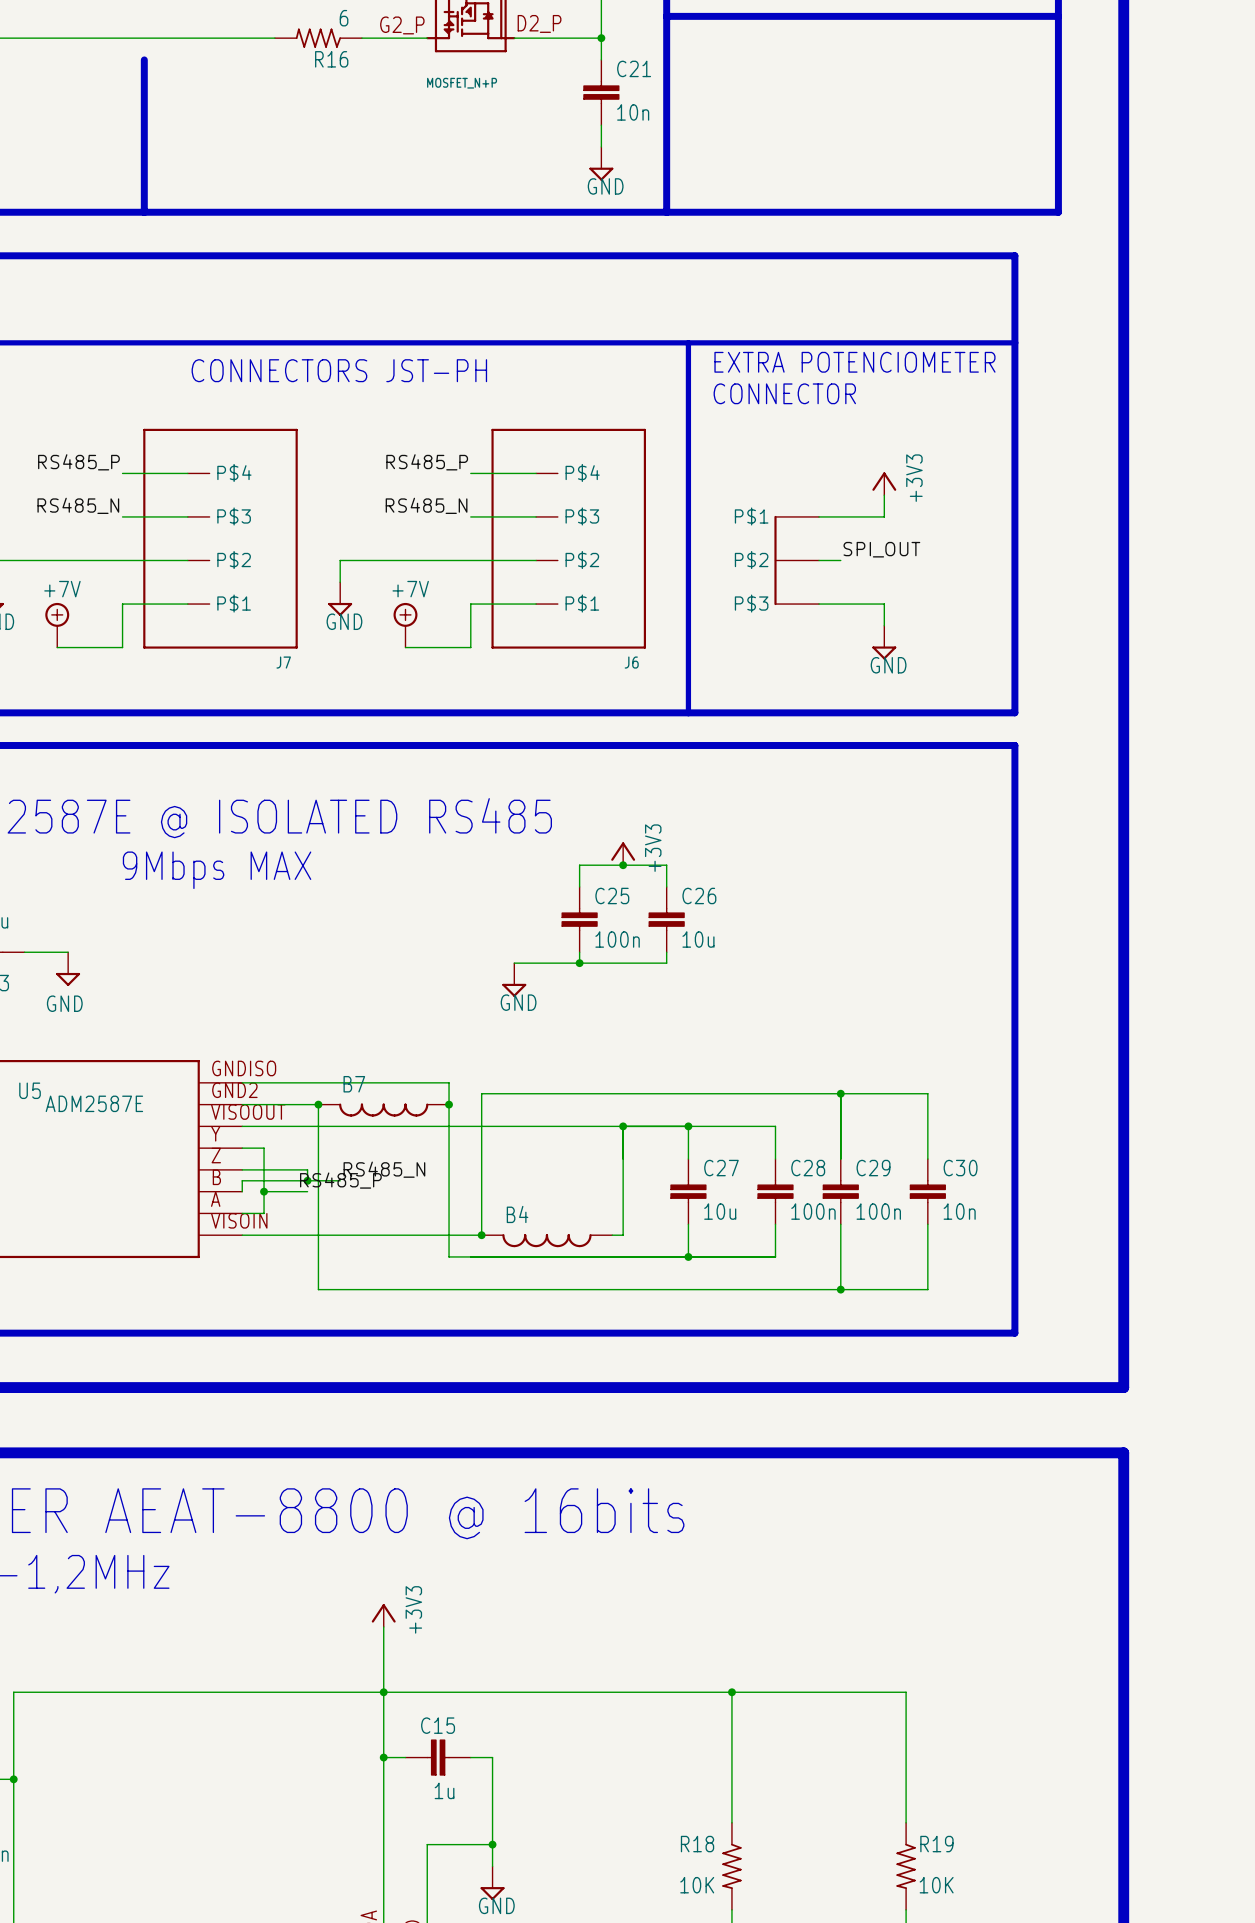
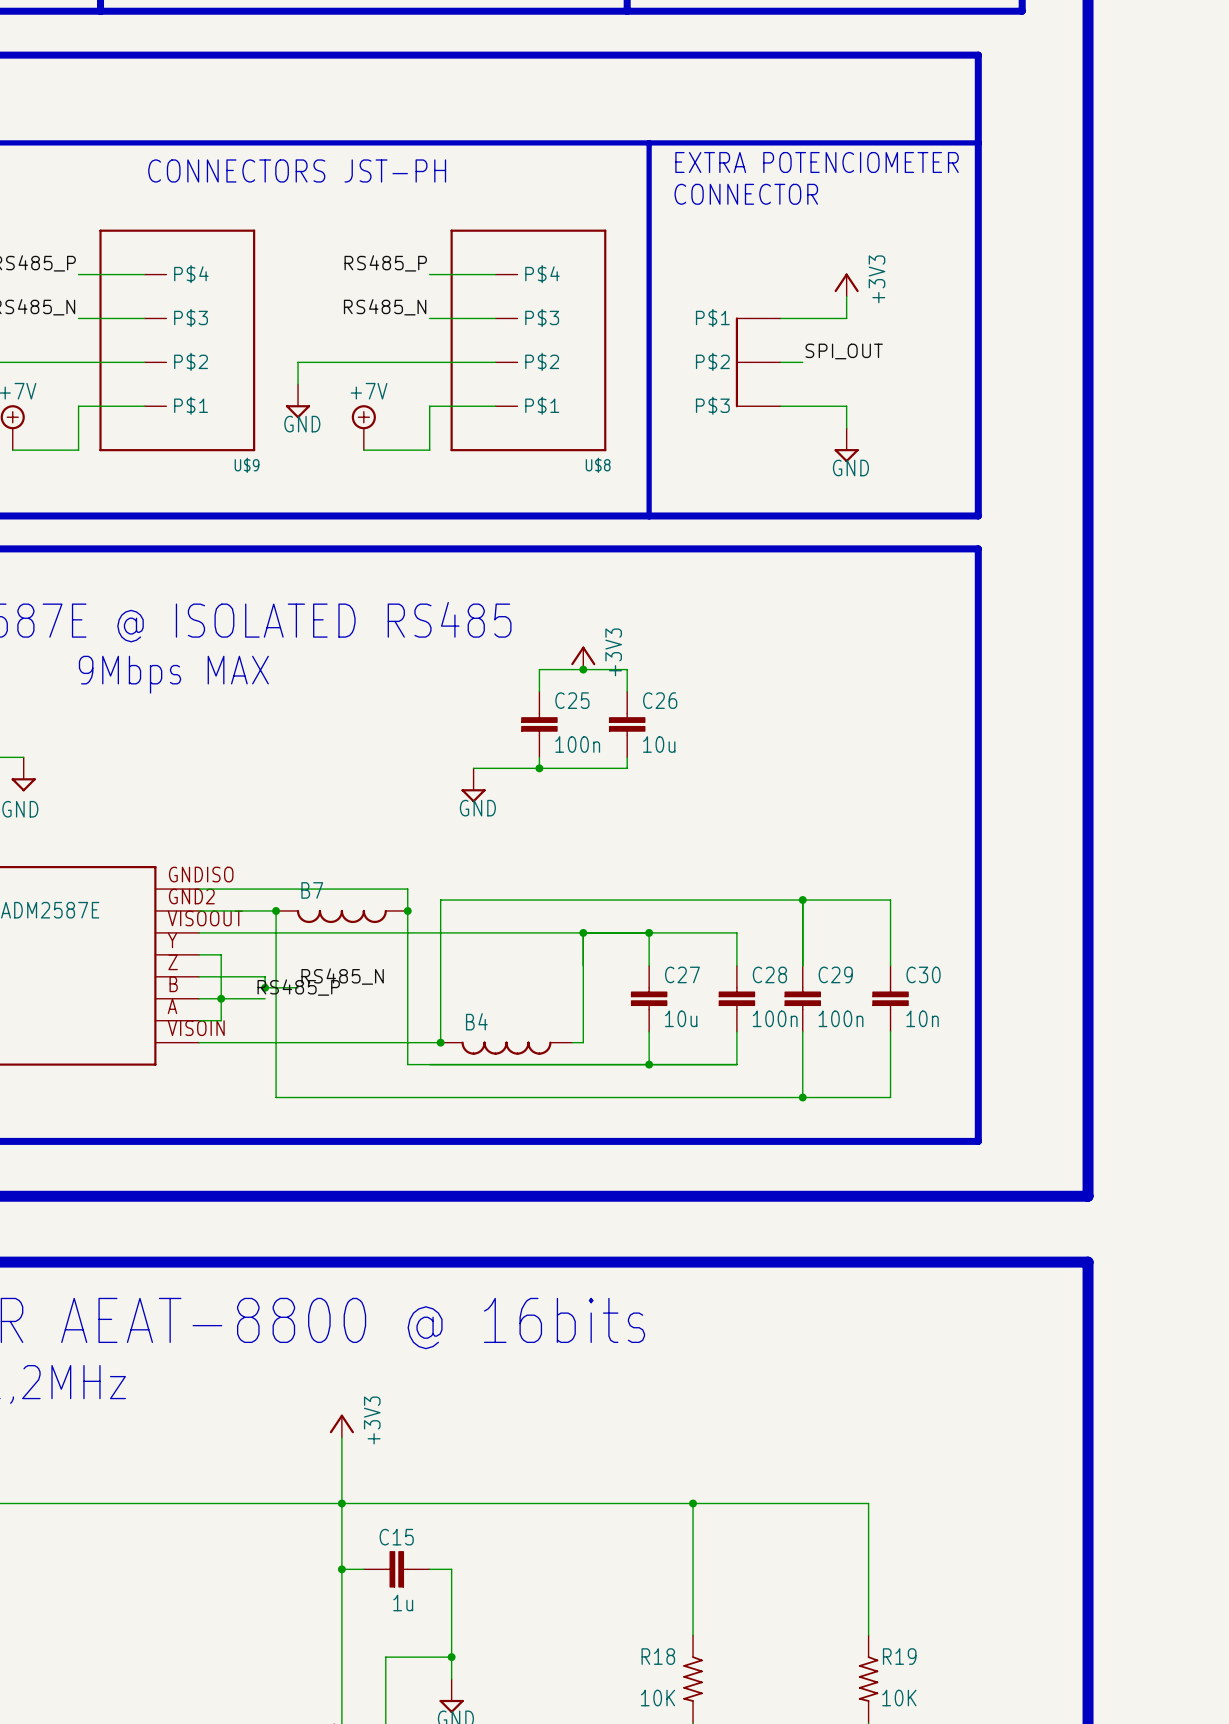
J7 name: J7 (283, 662) -> U$9 (247, 465)
J6 name: J6 (631, 662) -> U$8 (598, 465)
wire: (307, 1180) (242, 1180) (242, 1191) -> (221, 998) (199, 998)

